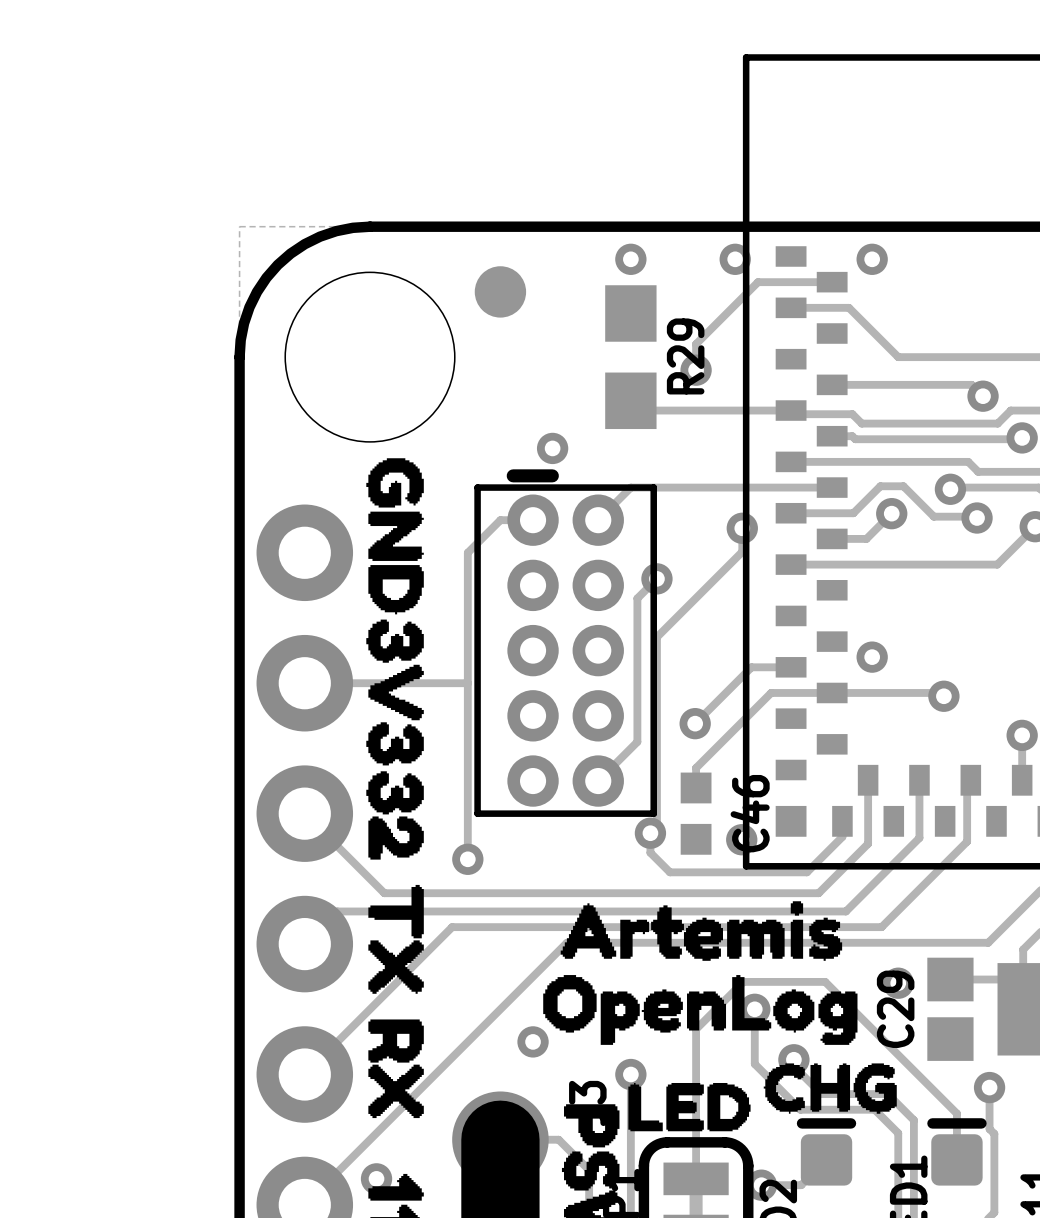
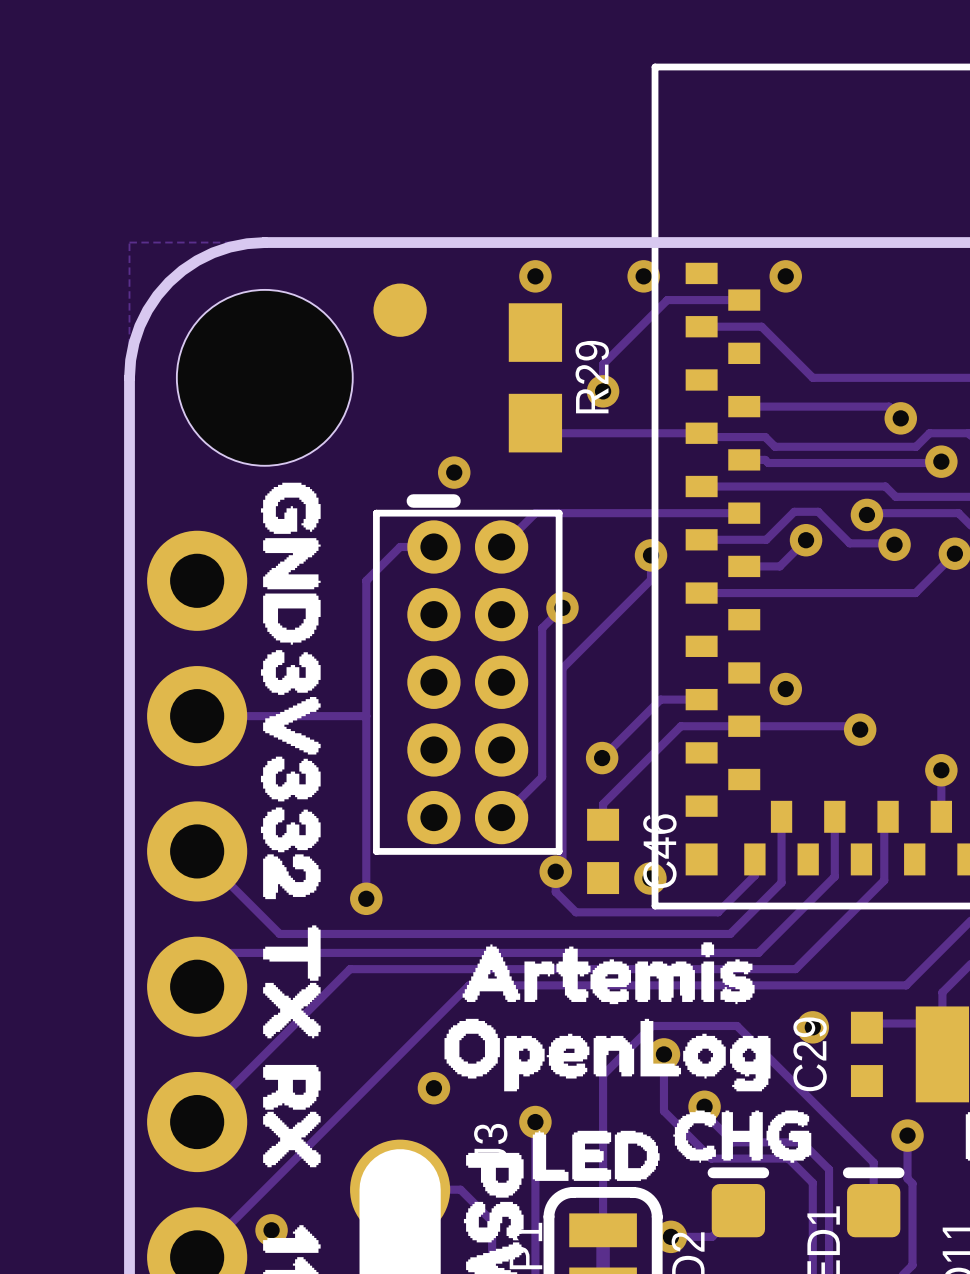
C29 footprint: [927, 957, 974, 1061] -> [850, 1011, 883, 1098]

